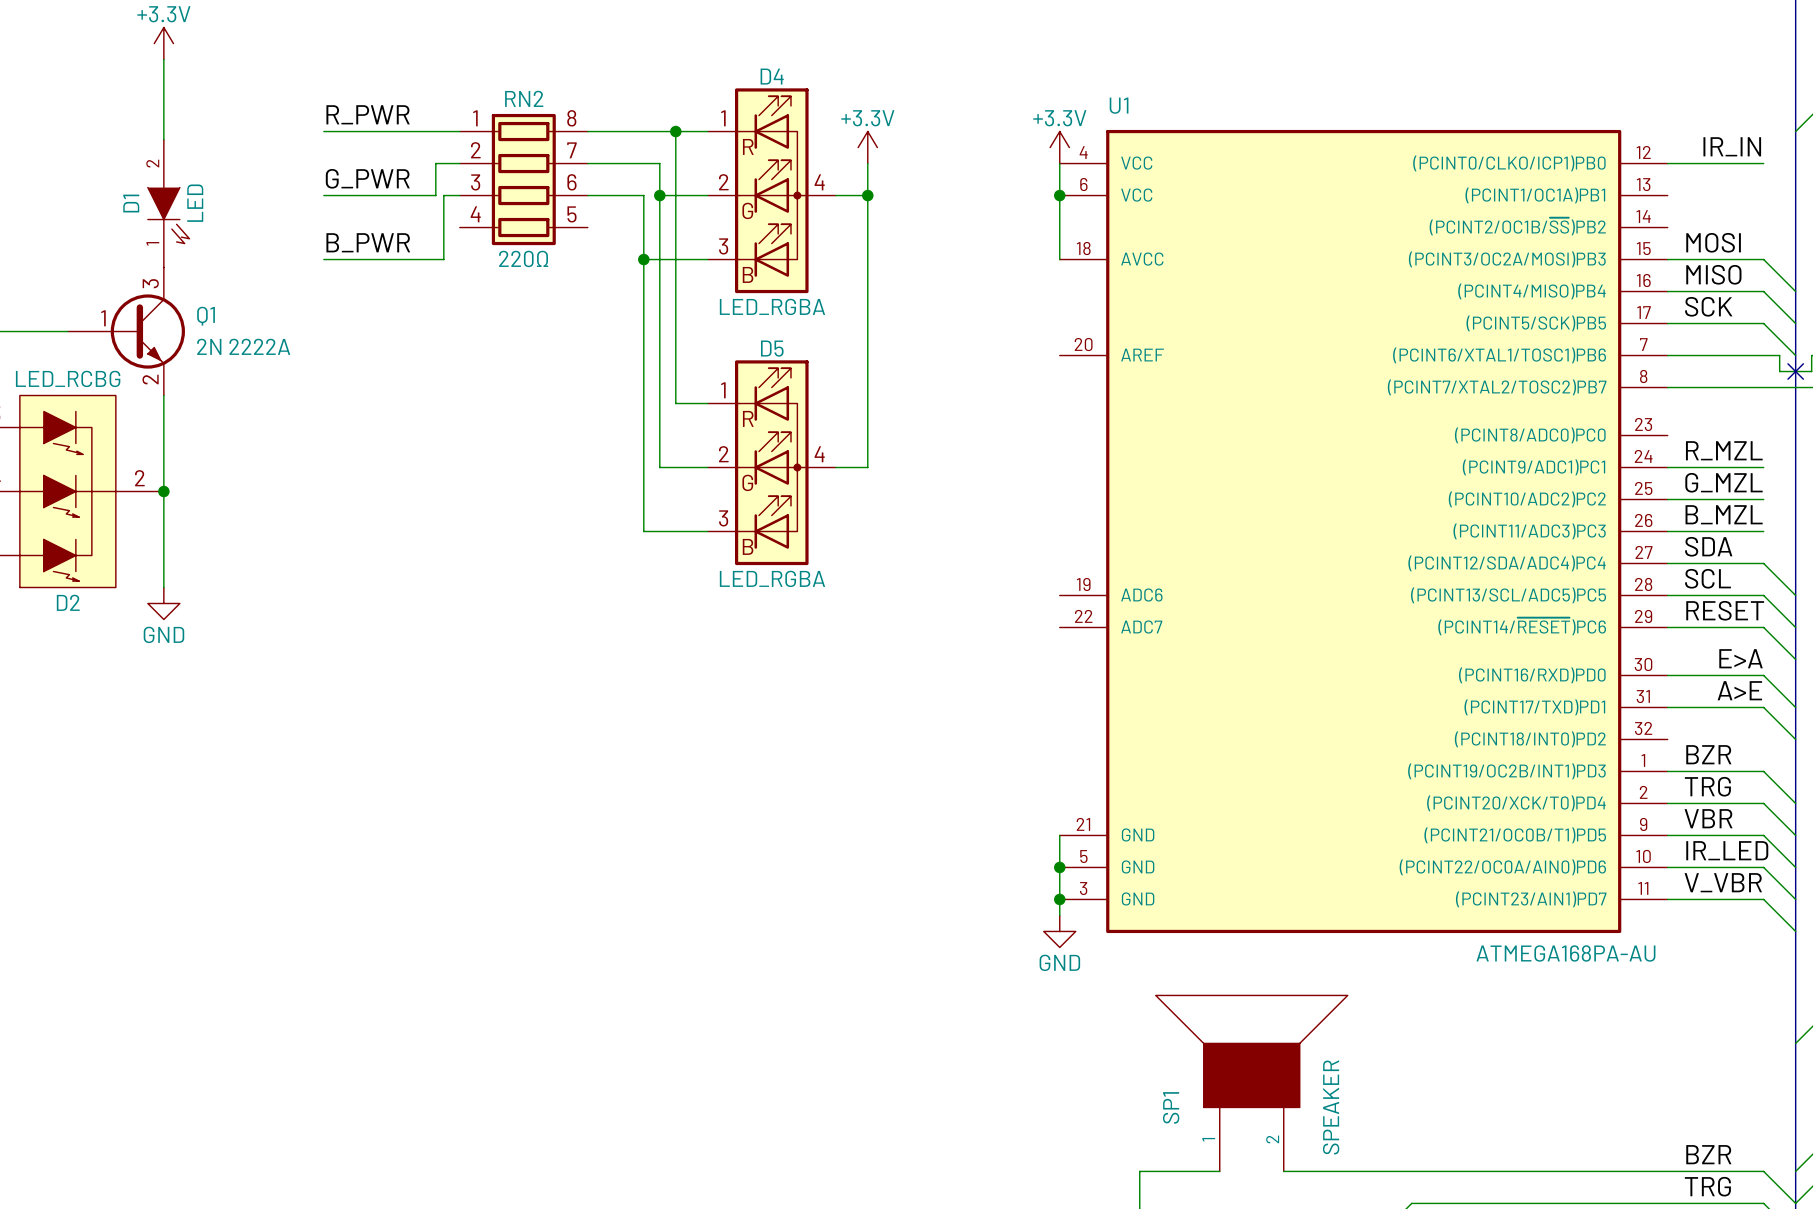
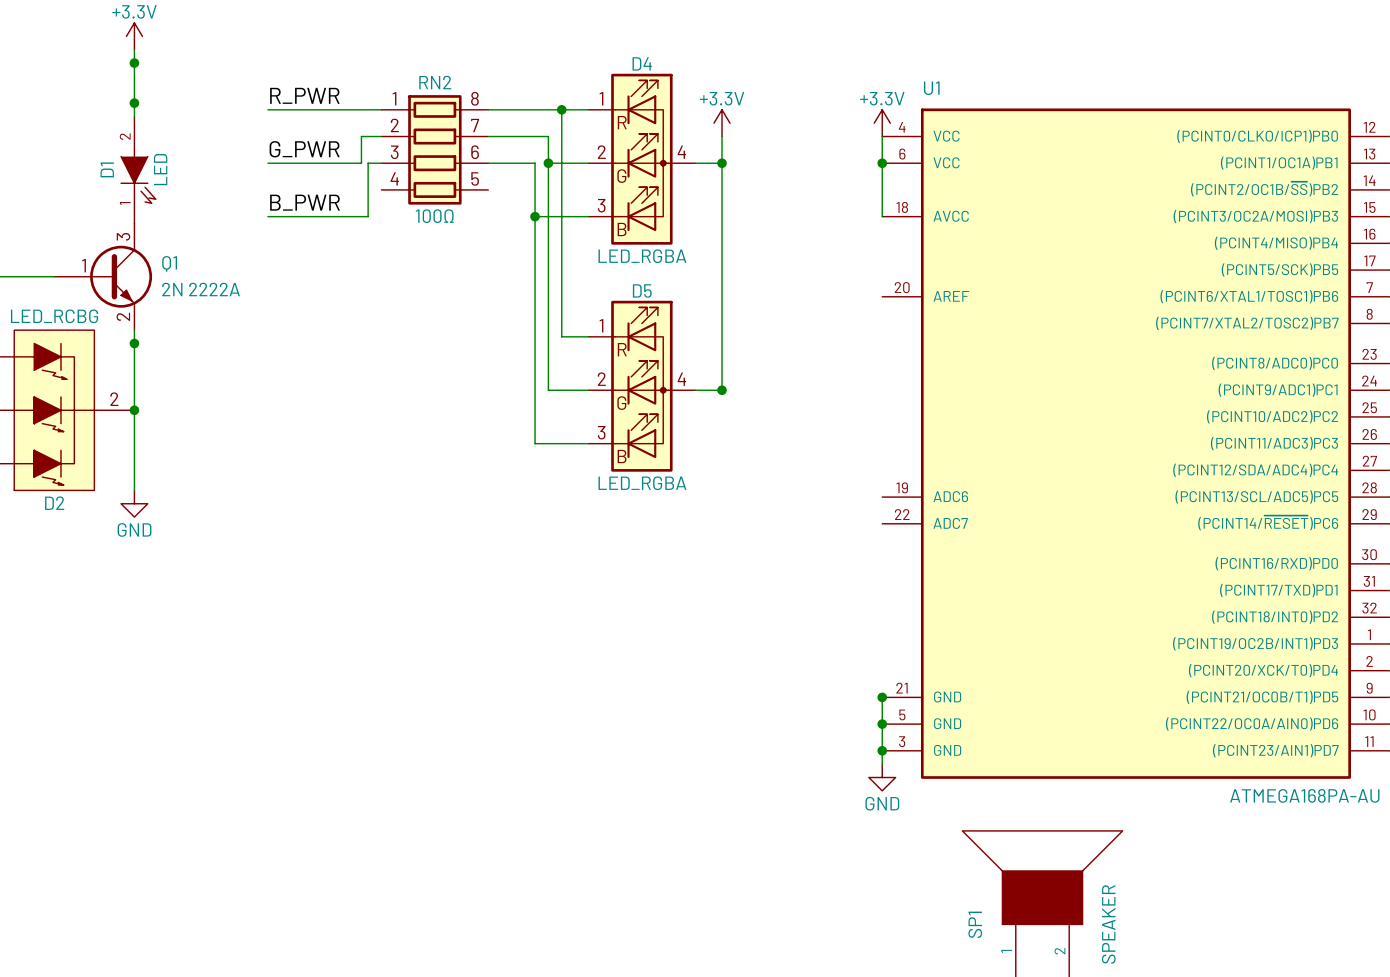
junction: none -> (134, 63)
junction: none -> (134, 103)
RN2 value: 220Ω (523, 258) -> 100Ω (434, 216)
junction: none -> (134, 343)
junction: none -> (722, 390)
junction: none -> (882, 697)

